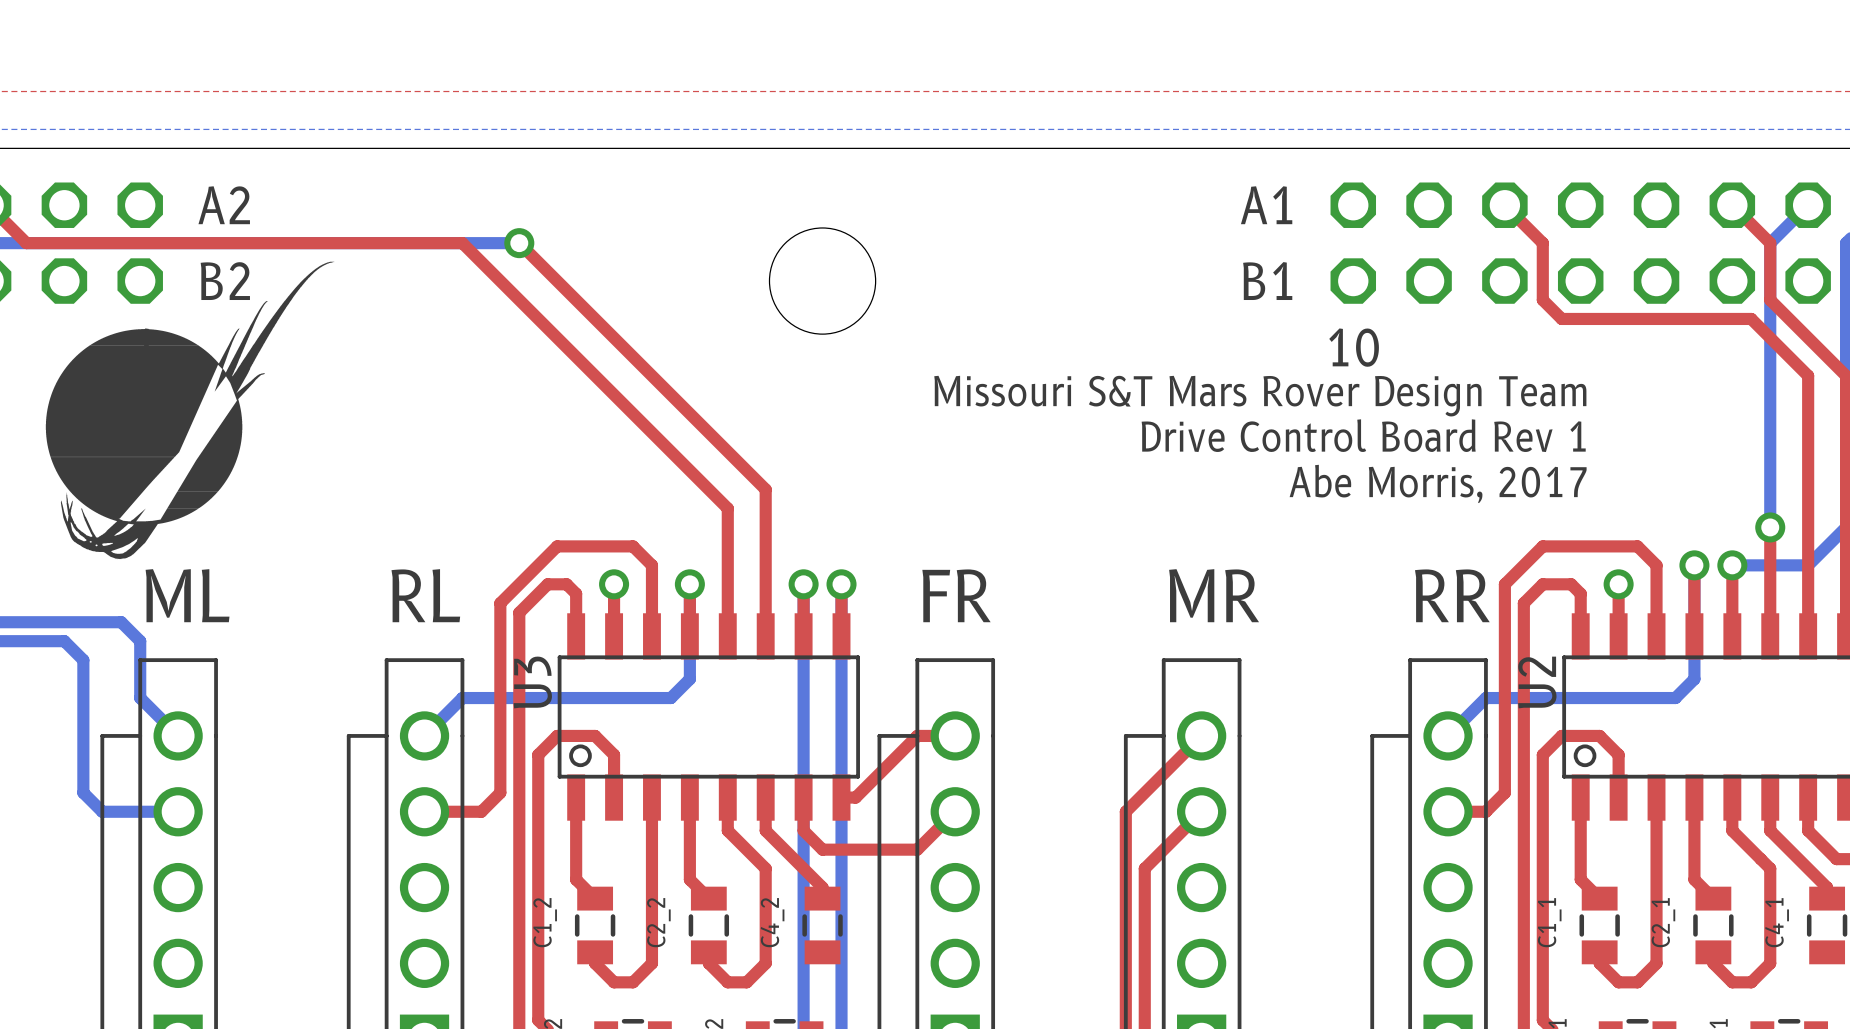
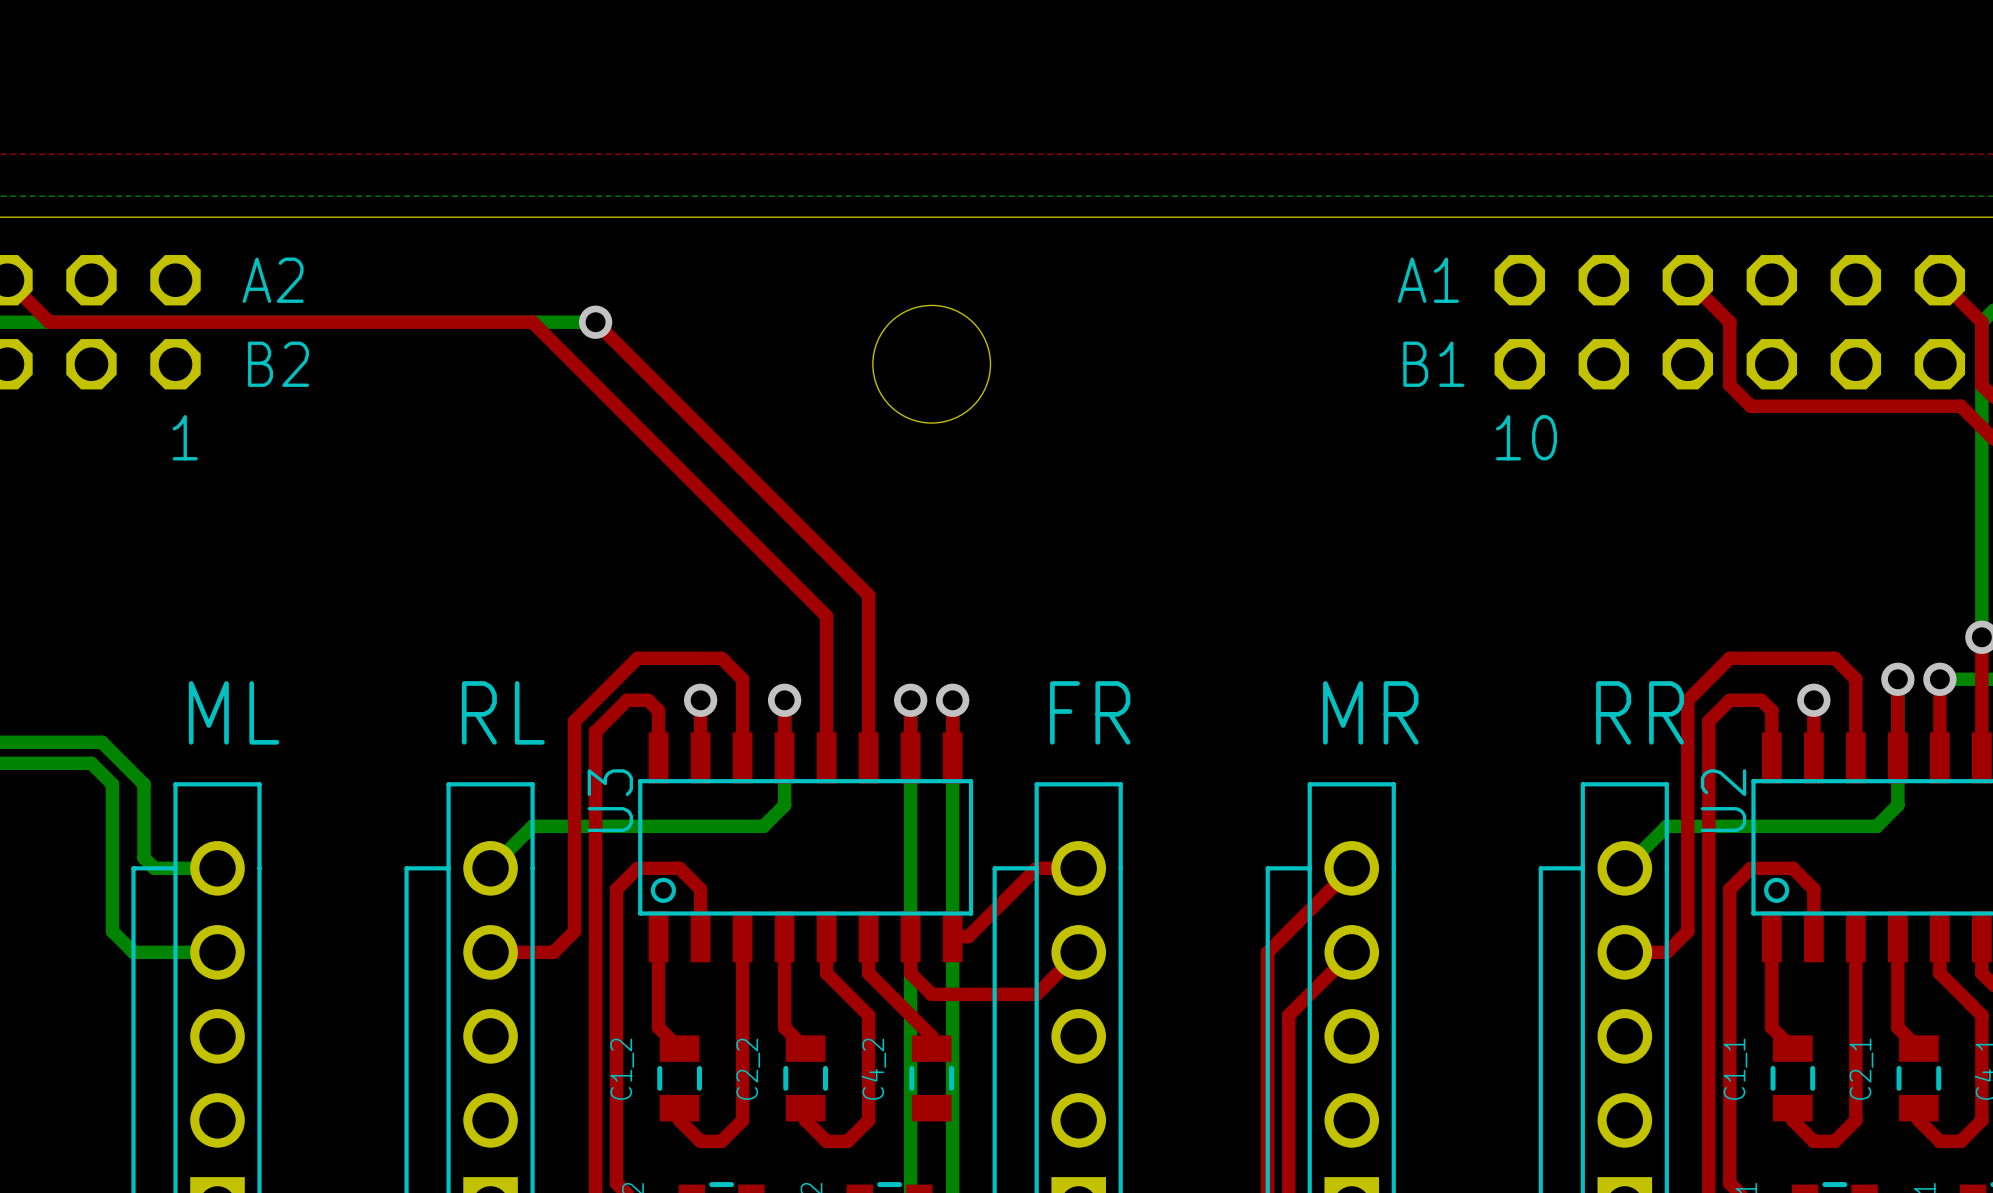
drawing: [45, 261, 335, 560] -> none
text: Missouri S&T Mars Rover Design Team (1260, 396) -> none
text: Drive Control Board Rev 1 (1363, 435) -> none
text: Abe Morris, 2017 (1438, 483) -> none
bottom track: (73, 622) (121, 622) (140, 641) (140, 698) (178, 735) -> (101, 742) (144, 784) (144, 857) (154, 868) (217, 868)

